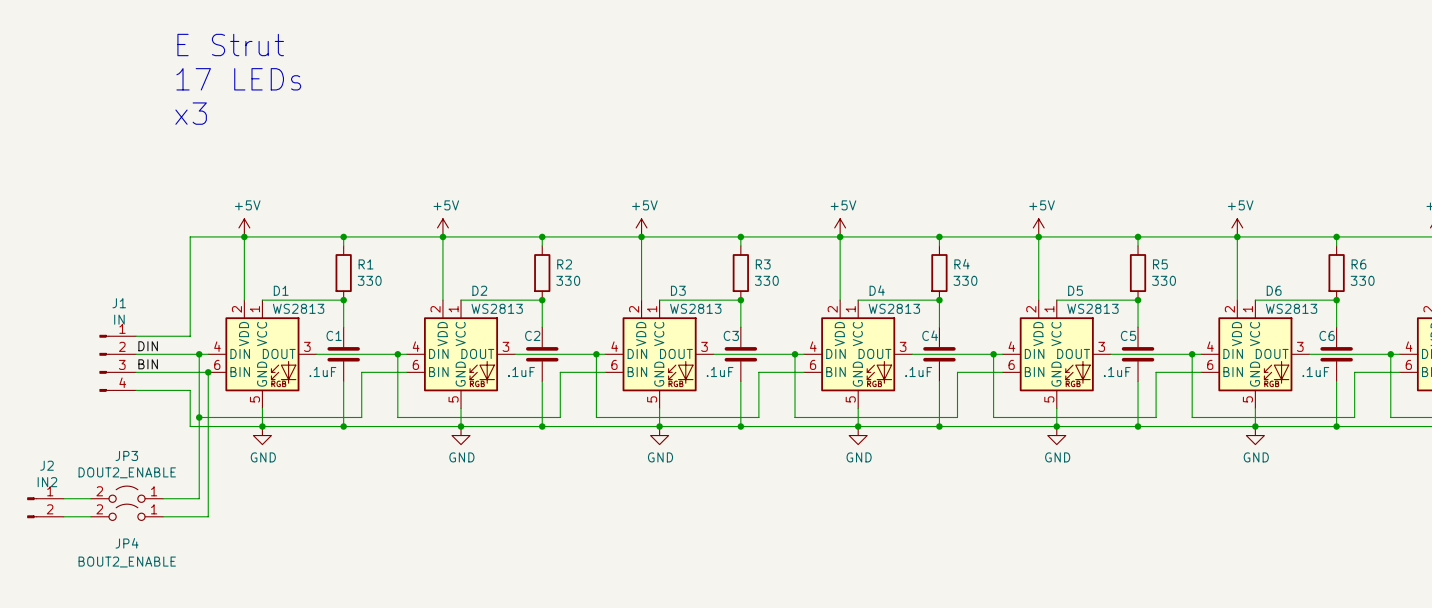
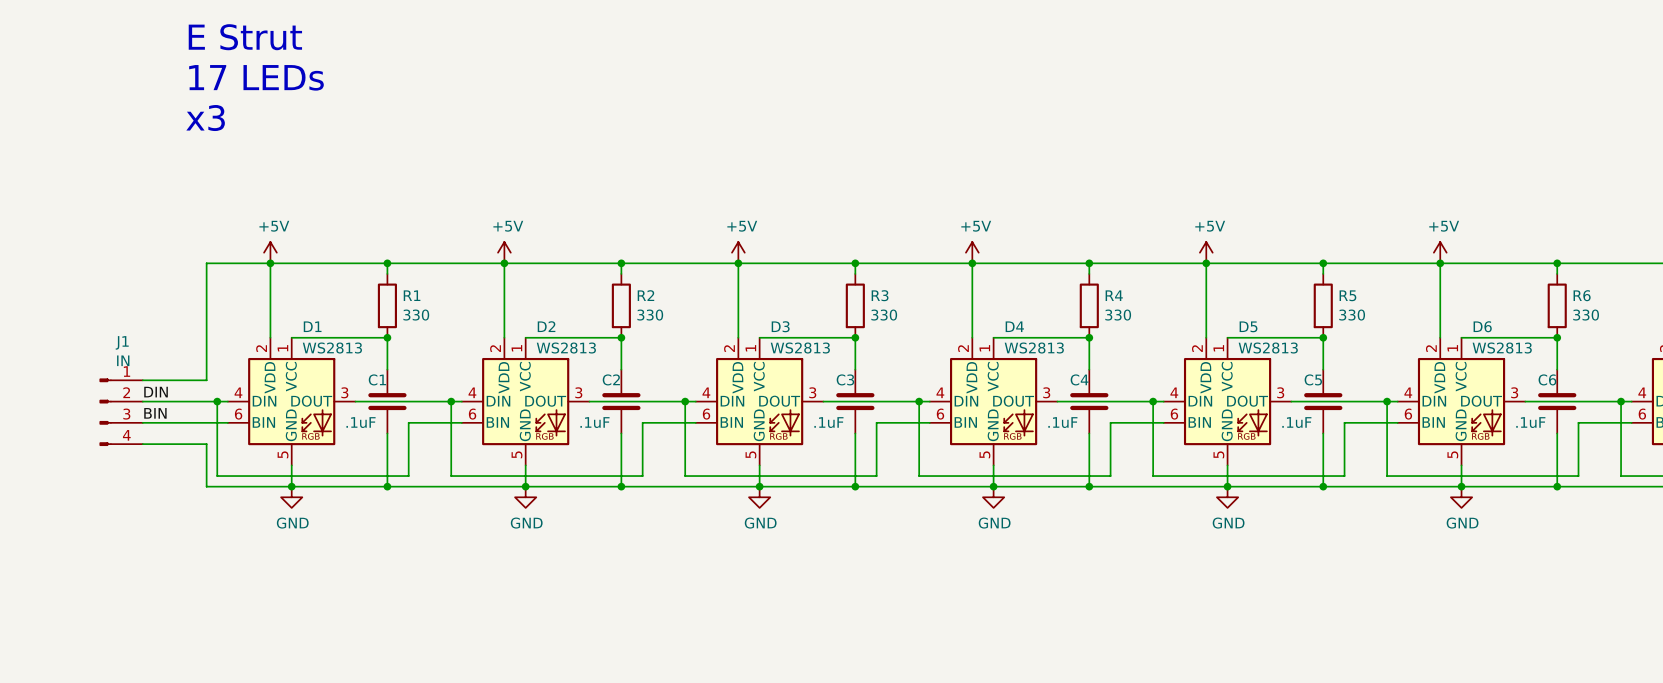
wire: (208, 372) (208, 516) (163, 516) -> none
junction: (208, 372) -> none
wire: (199, 417) (199, 498) (163, 498) -> none
junction: (199, 417) -> none
JP3: DOUT2_ENABLE (127, 494) -> none
wire: (63, 498) (90, 498) -> none
J2: IN2 (45, 507) -> none
JP4: BOUT2_ENABLE (127, 512) -> none
wire: (63, 516) (90, 516) -> none

